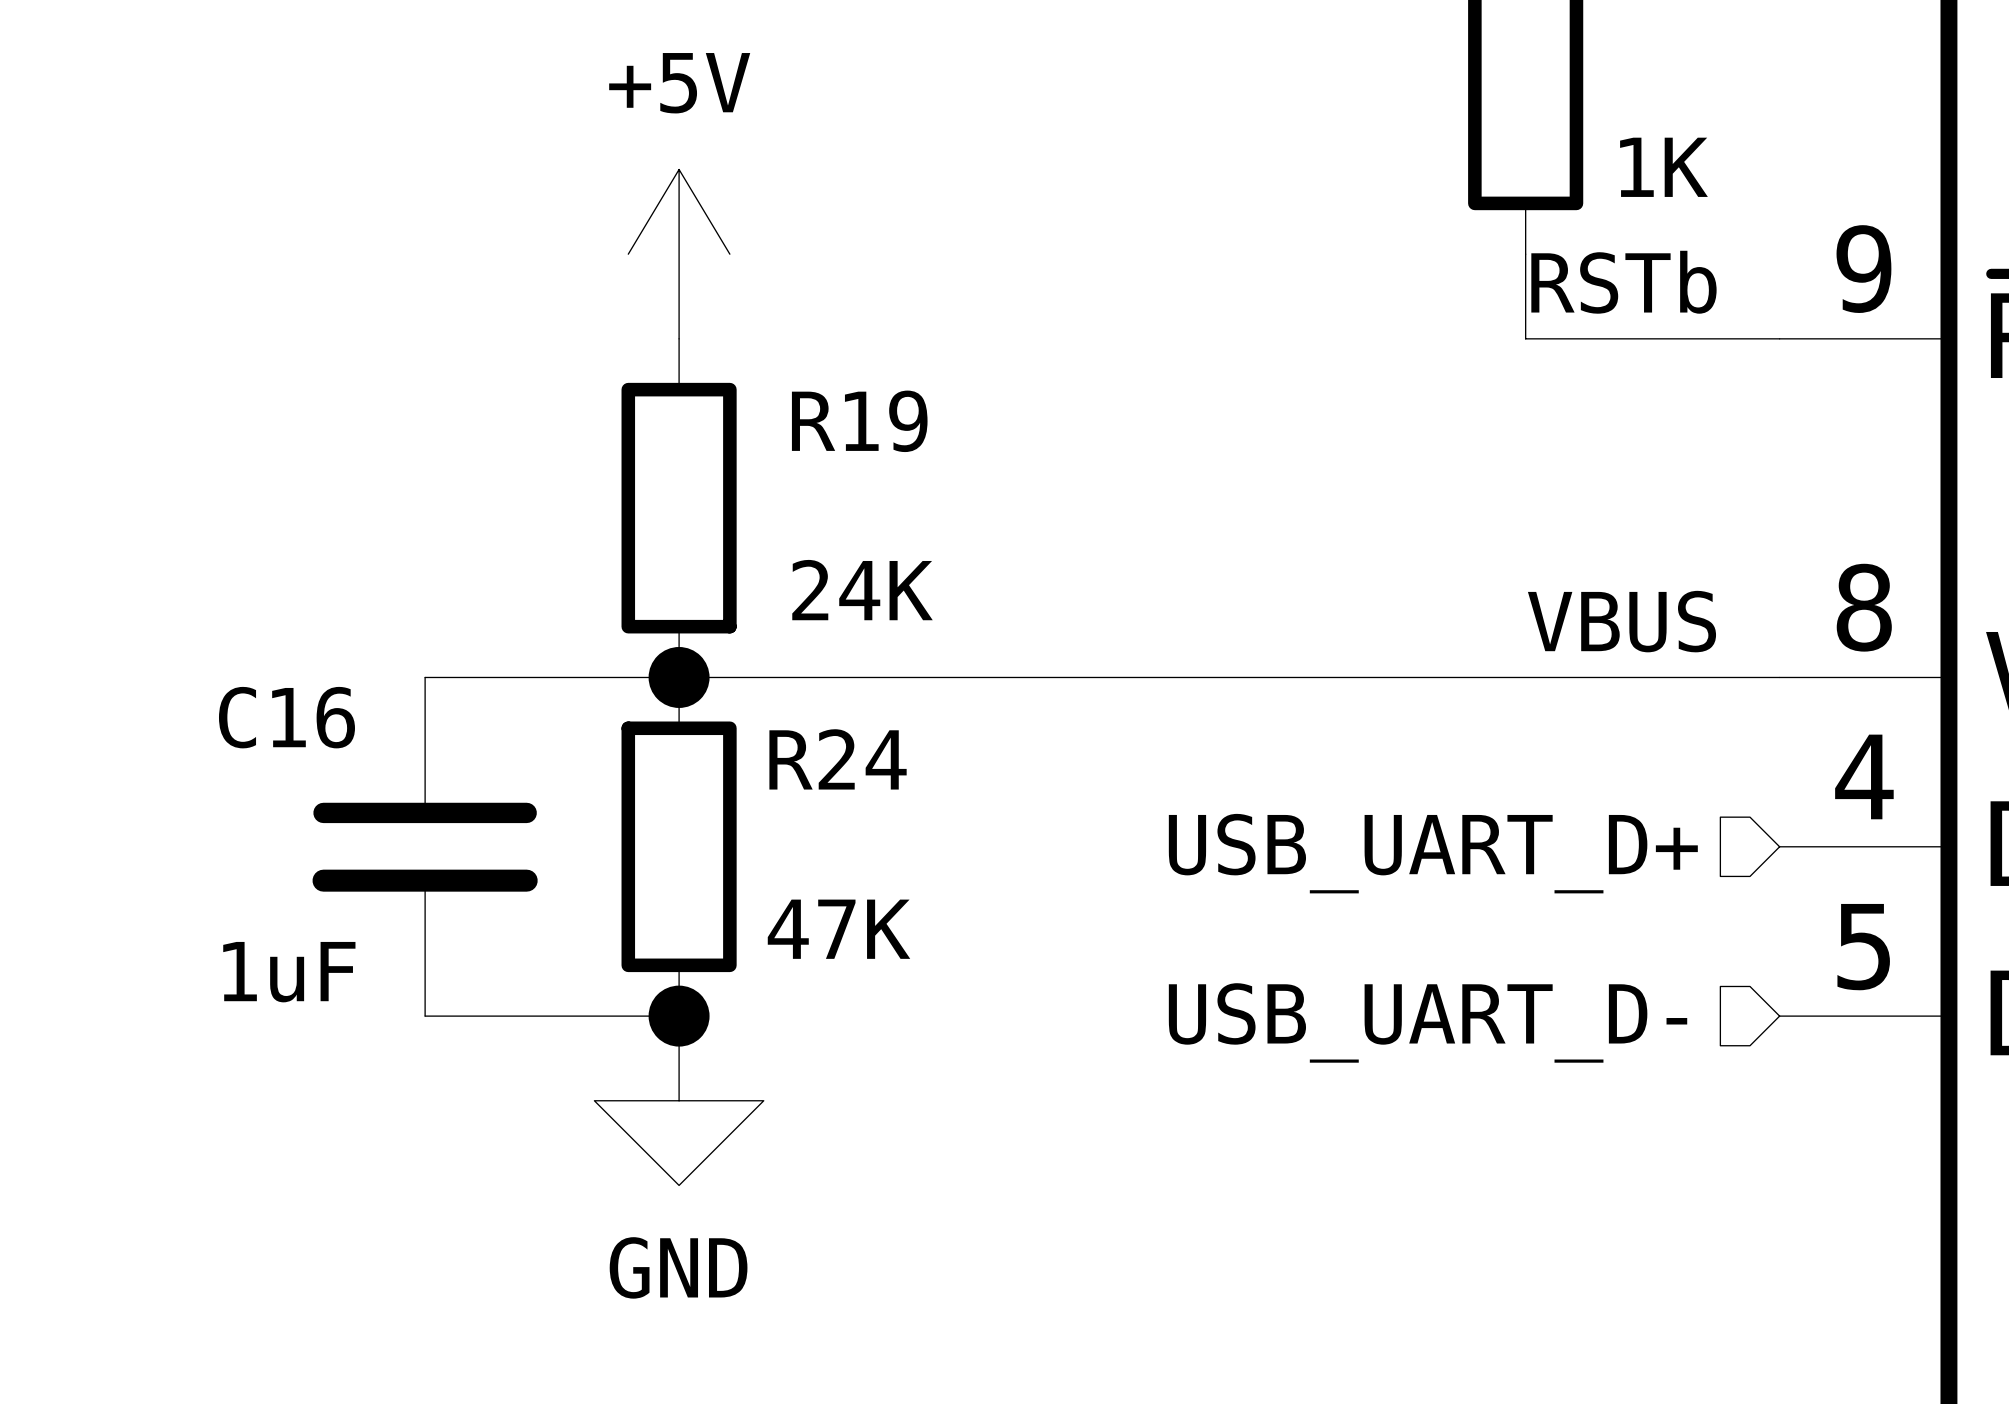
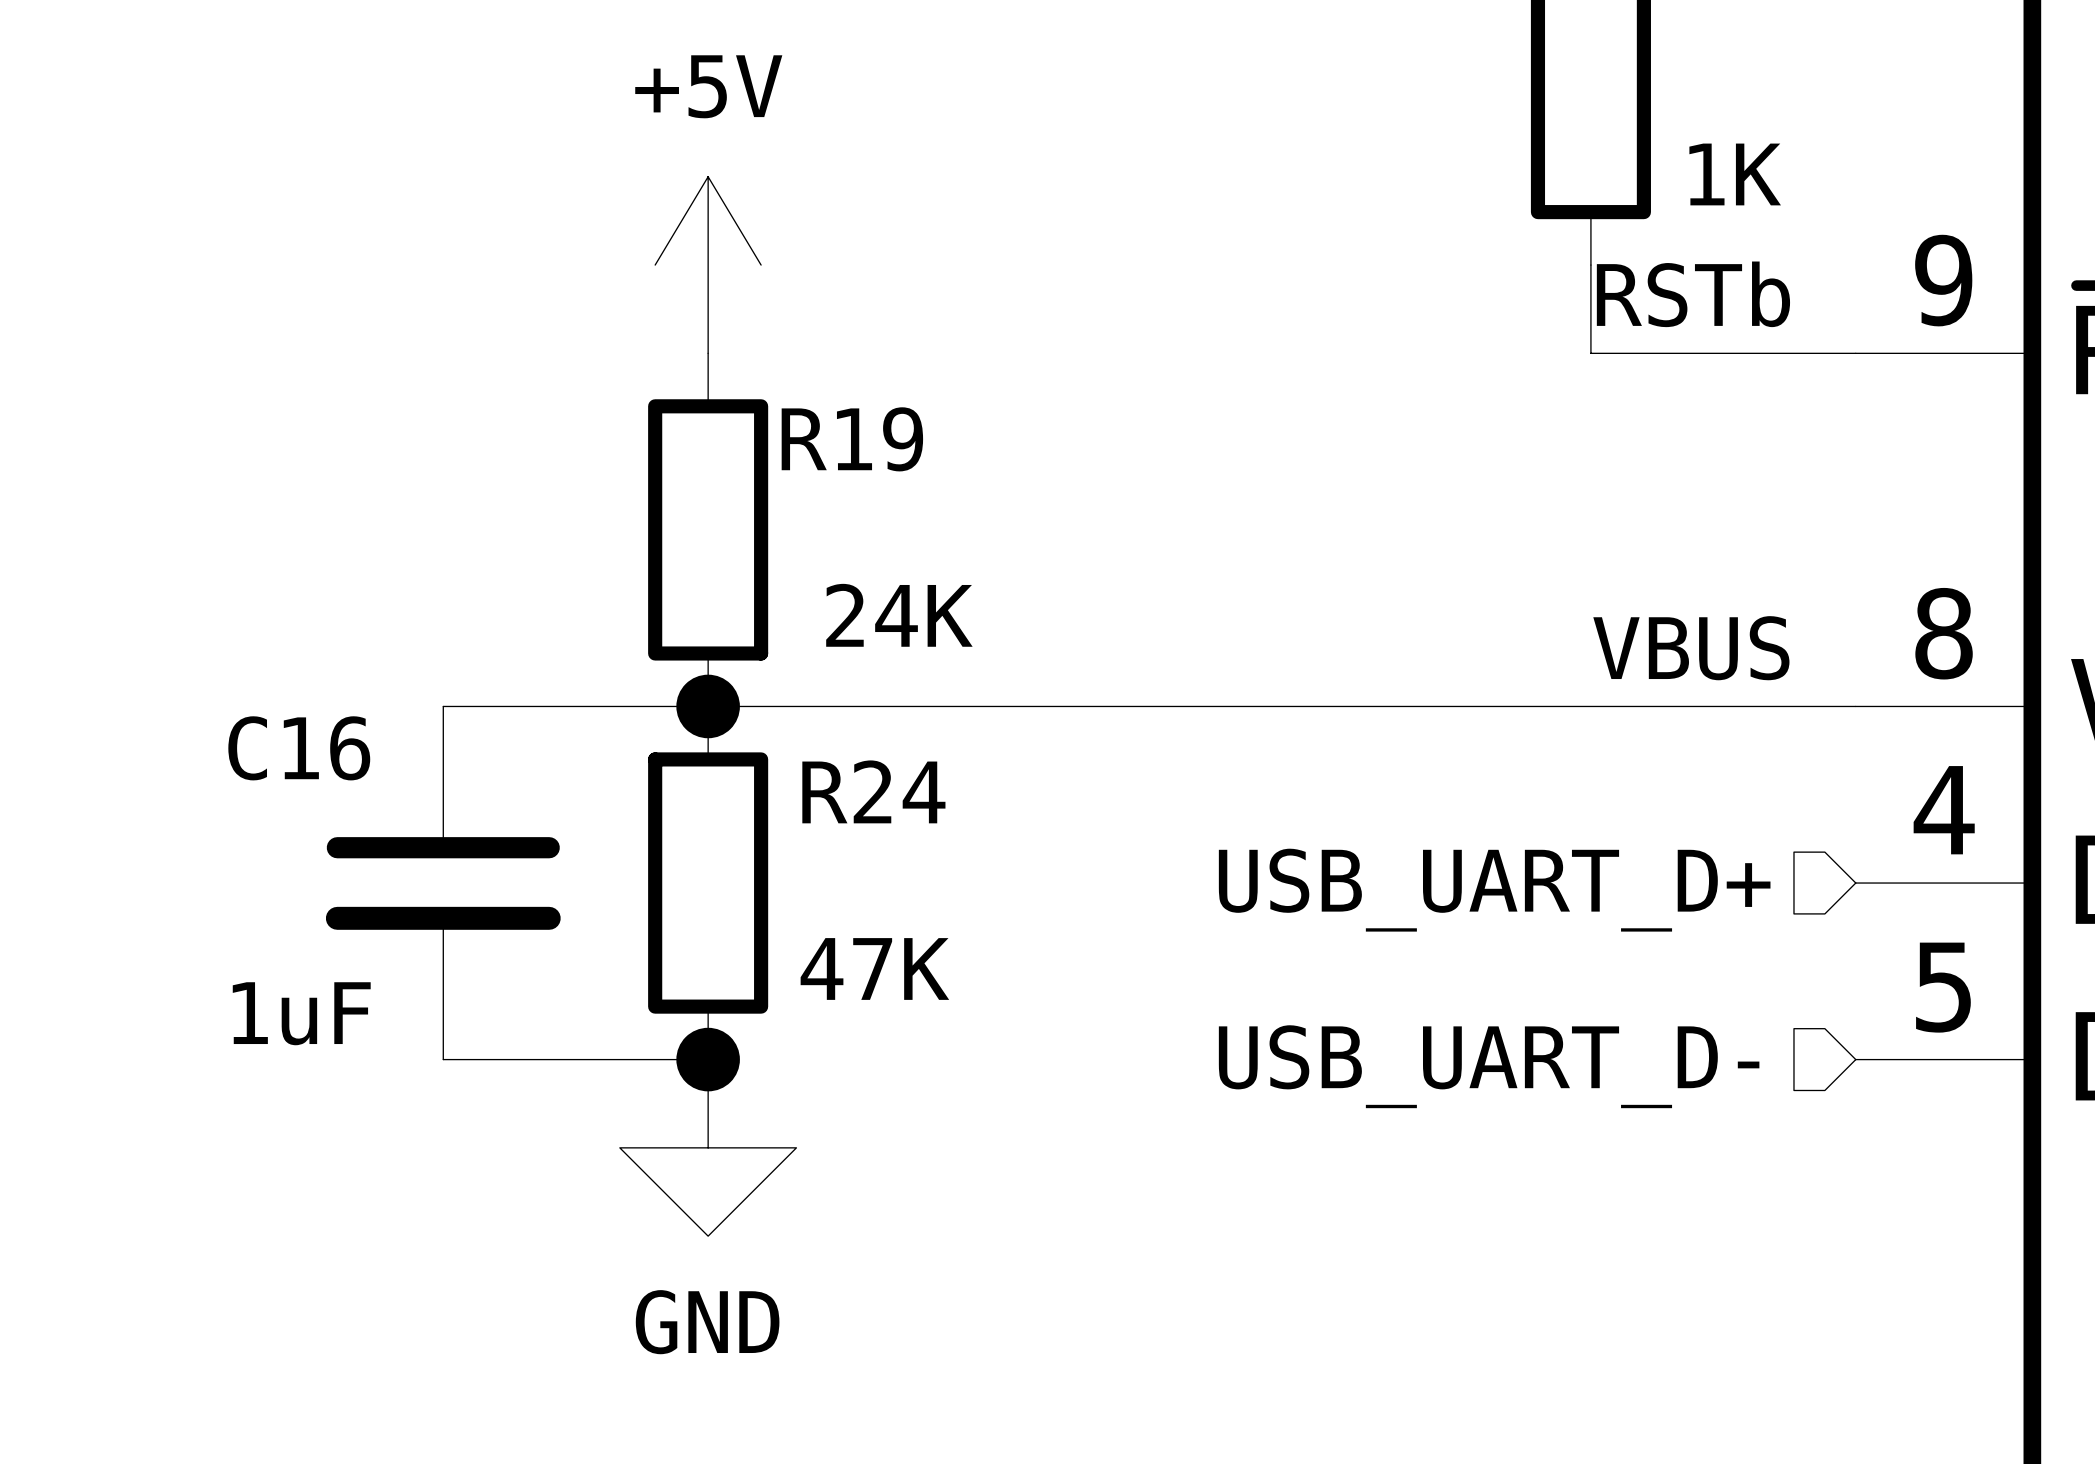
R19 name position: R19 (859, 421) -> R19 (852, 439)

